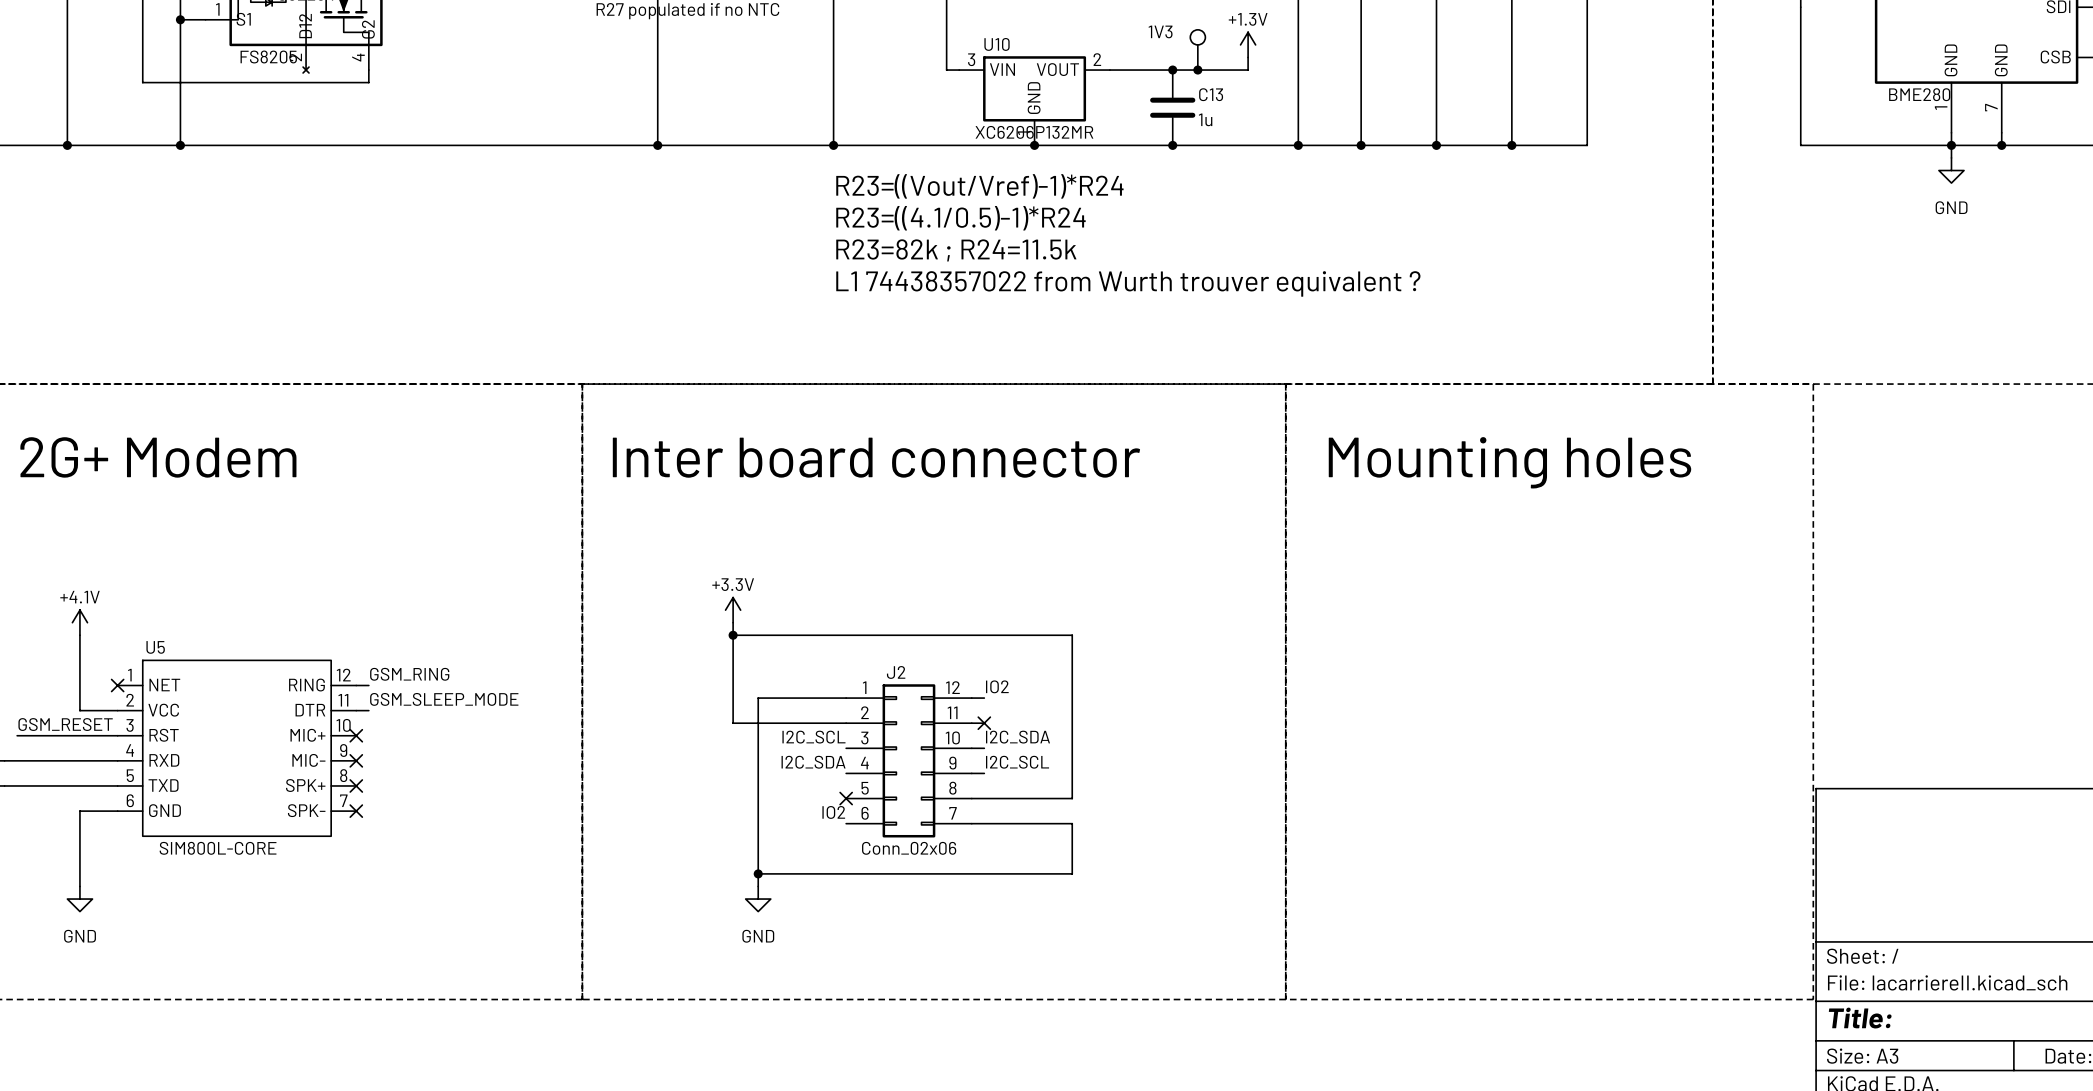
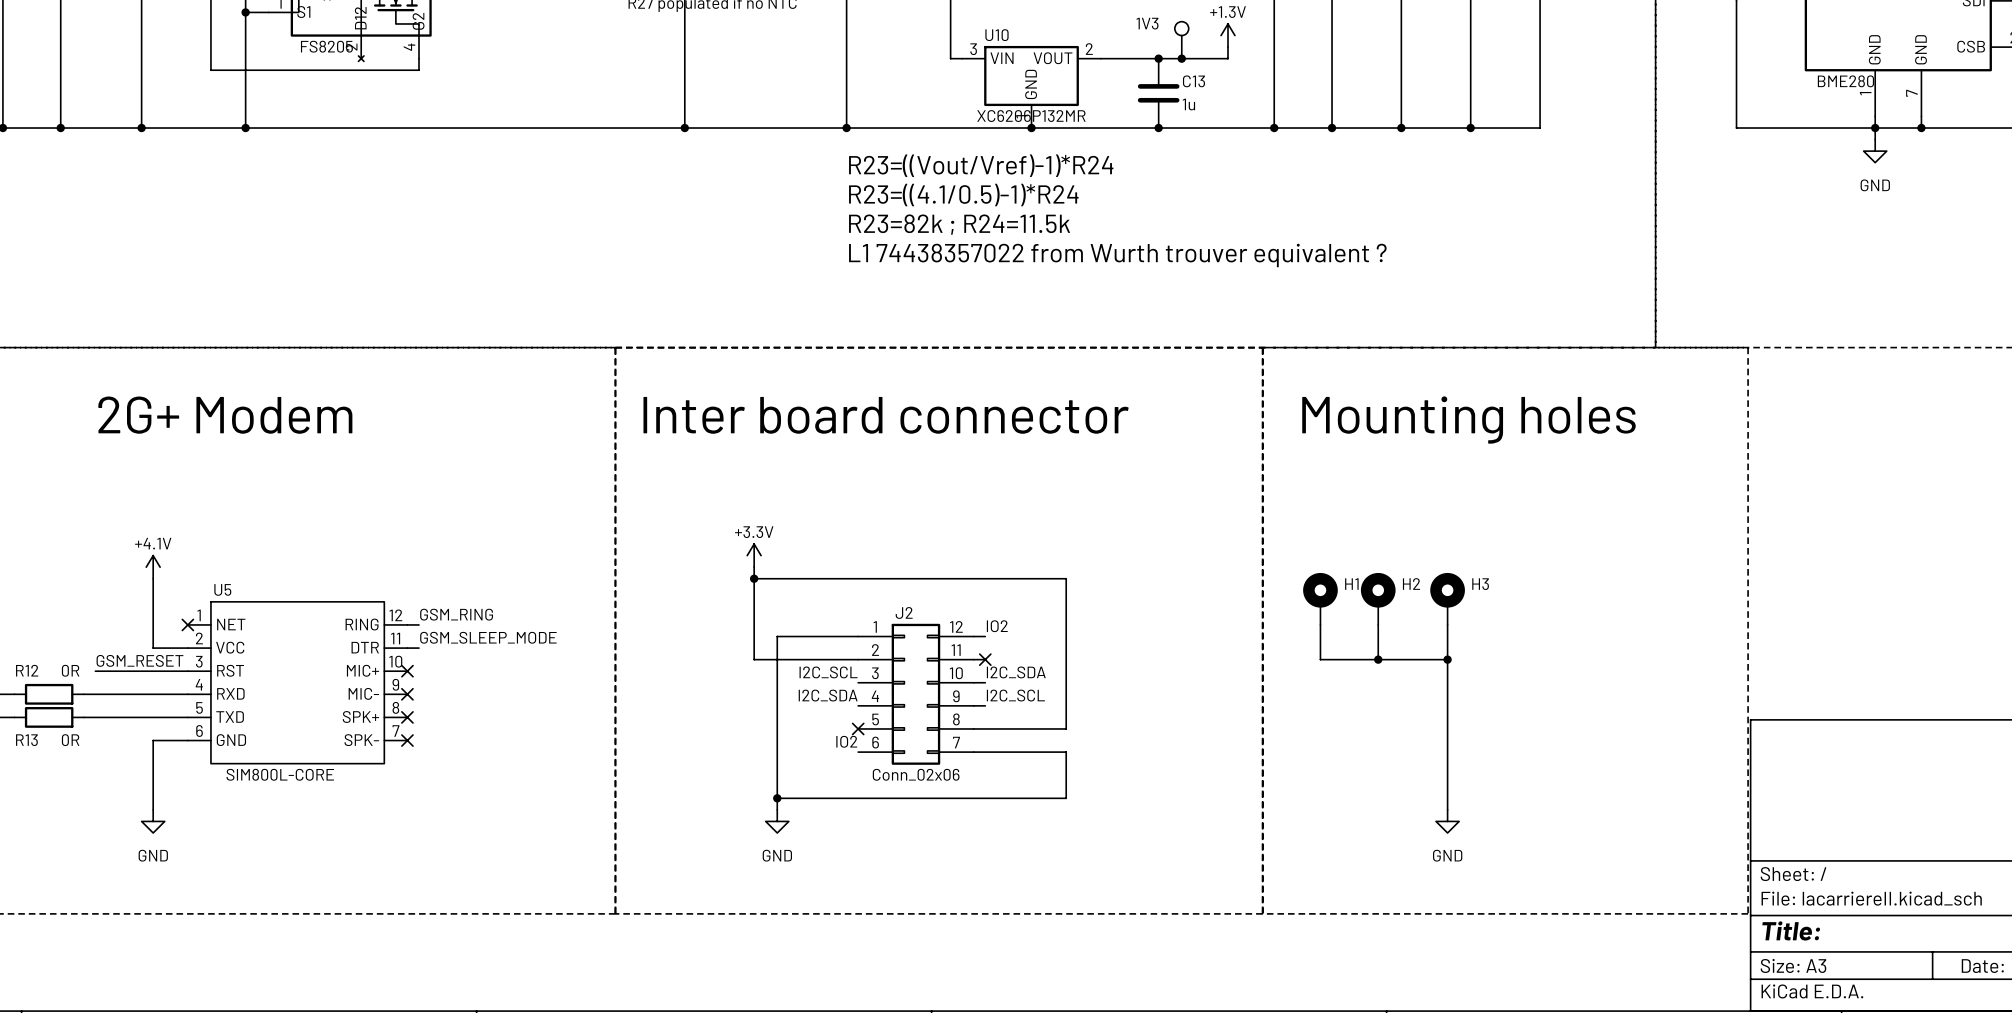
H1: none -> (1320, 598)
H2: none -> (1378, 598)
H3: none -> (1447, 598)
wire: none -> (1320, 624) (1320, 659) (1447, 659)
wire: none -> (1378, 624) (1378, 659)
wire: none -> (1447, 624) (1447, 809)
junction: none -> (1378, 659)
junction: none -> (1447, 659)
power symbol: none -> GND (1447, 821)

